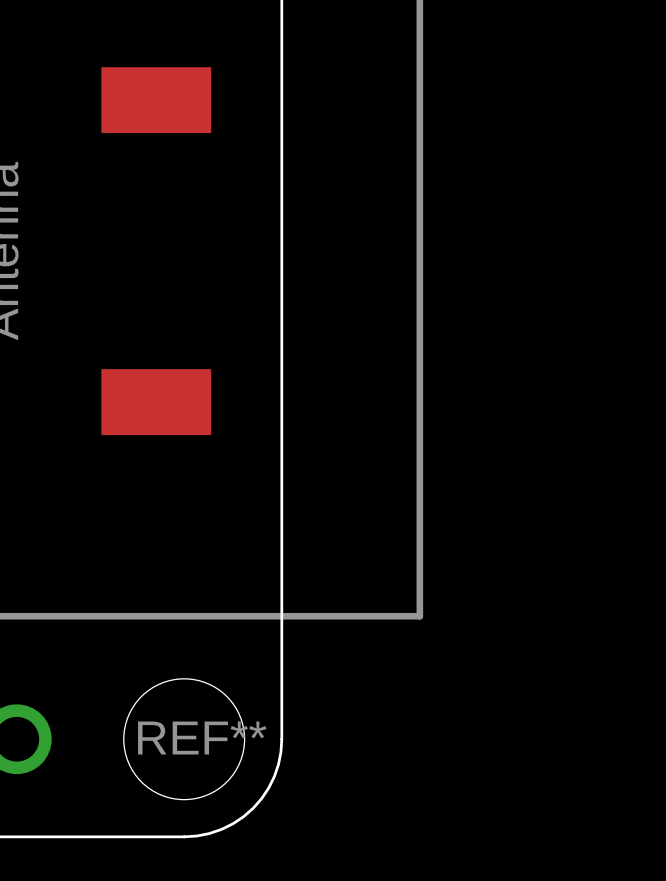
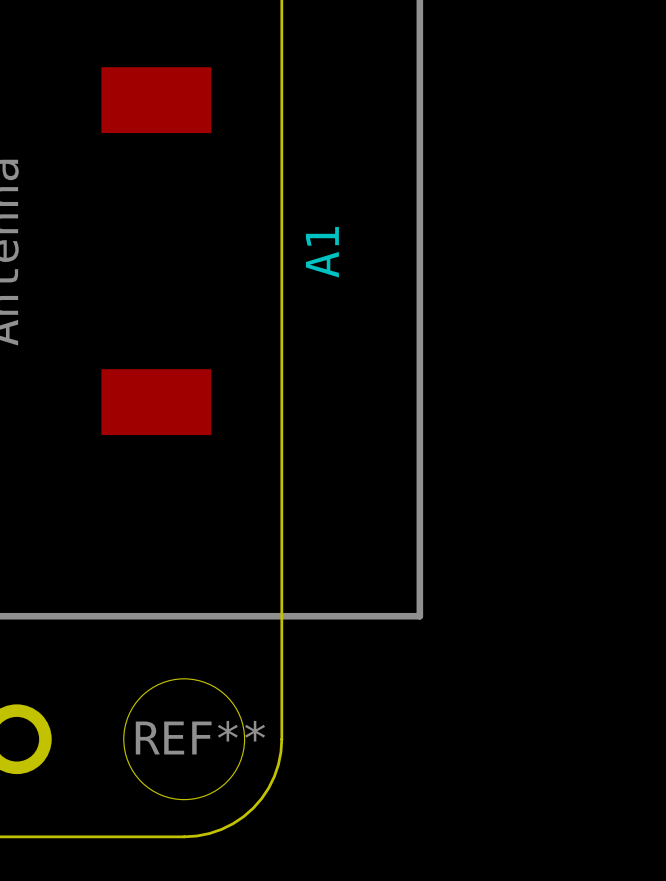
A1 name: none -> A1 (322, 252)

